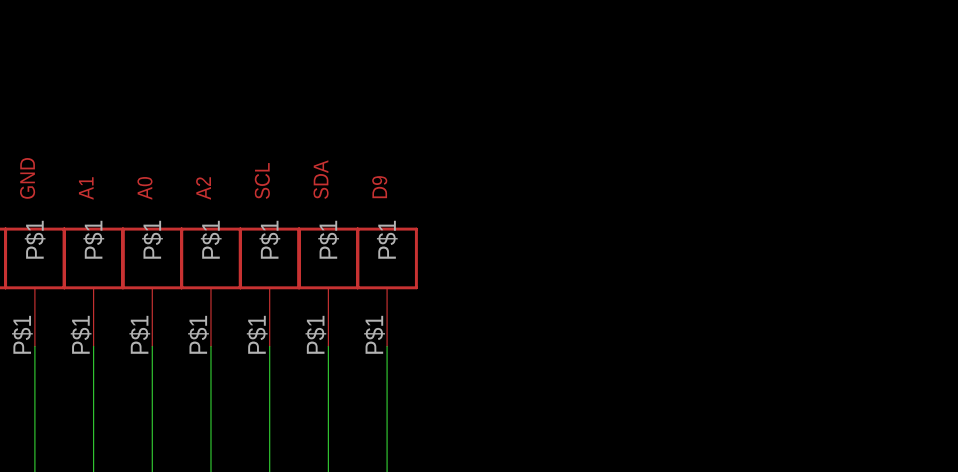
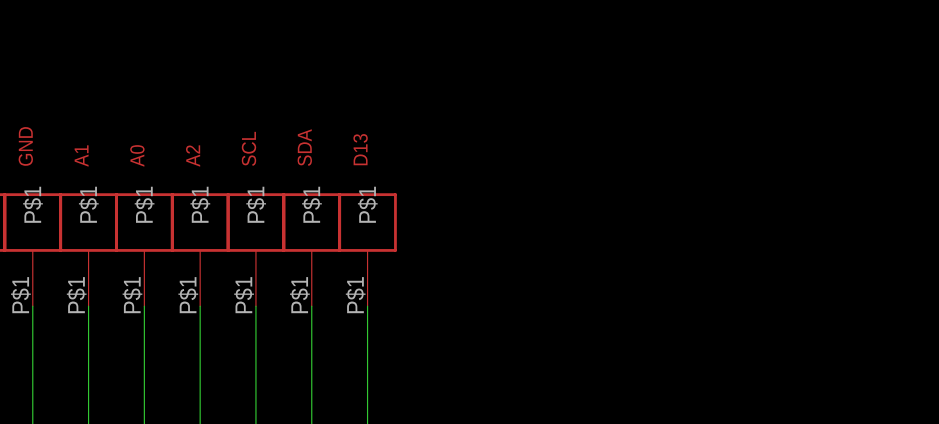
D9 name: D9 (379, 187) -> D13 (360, 149)

